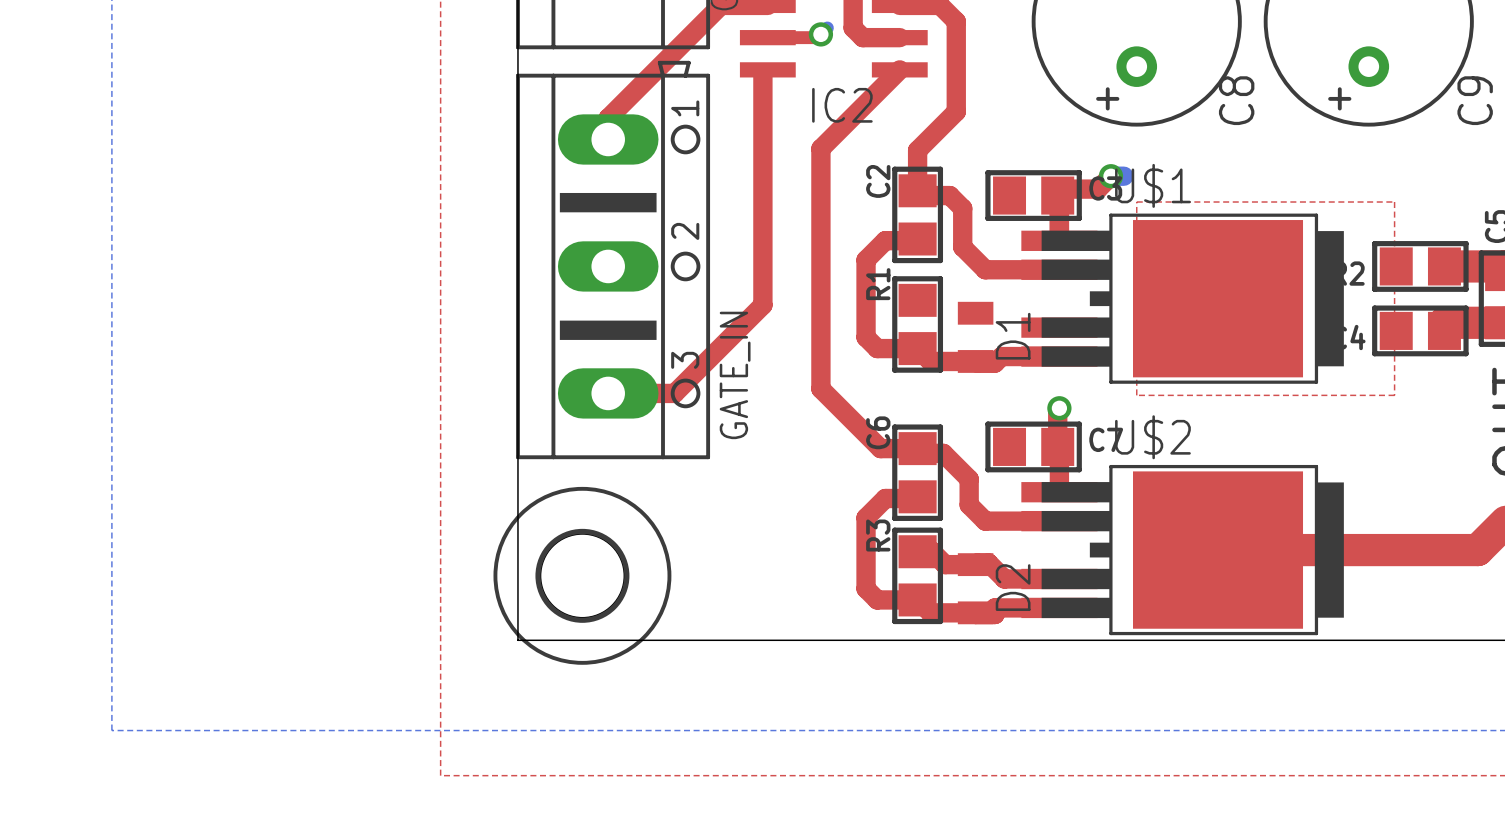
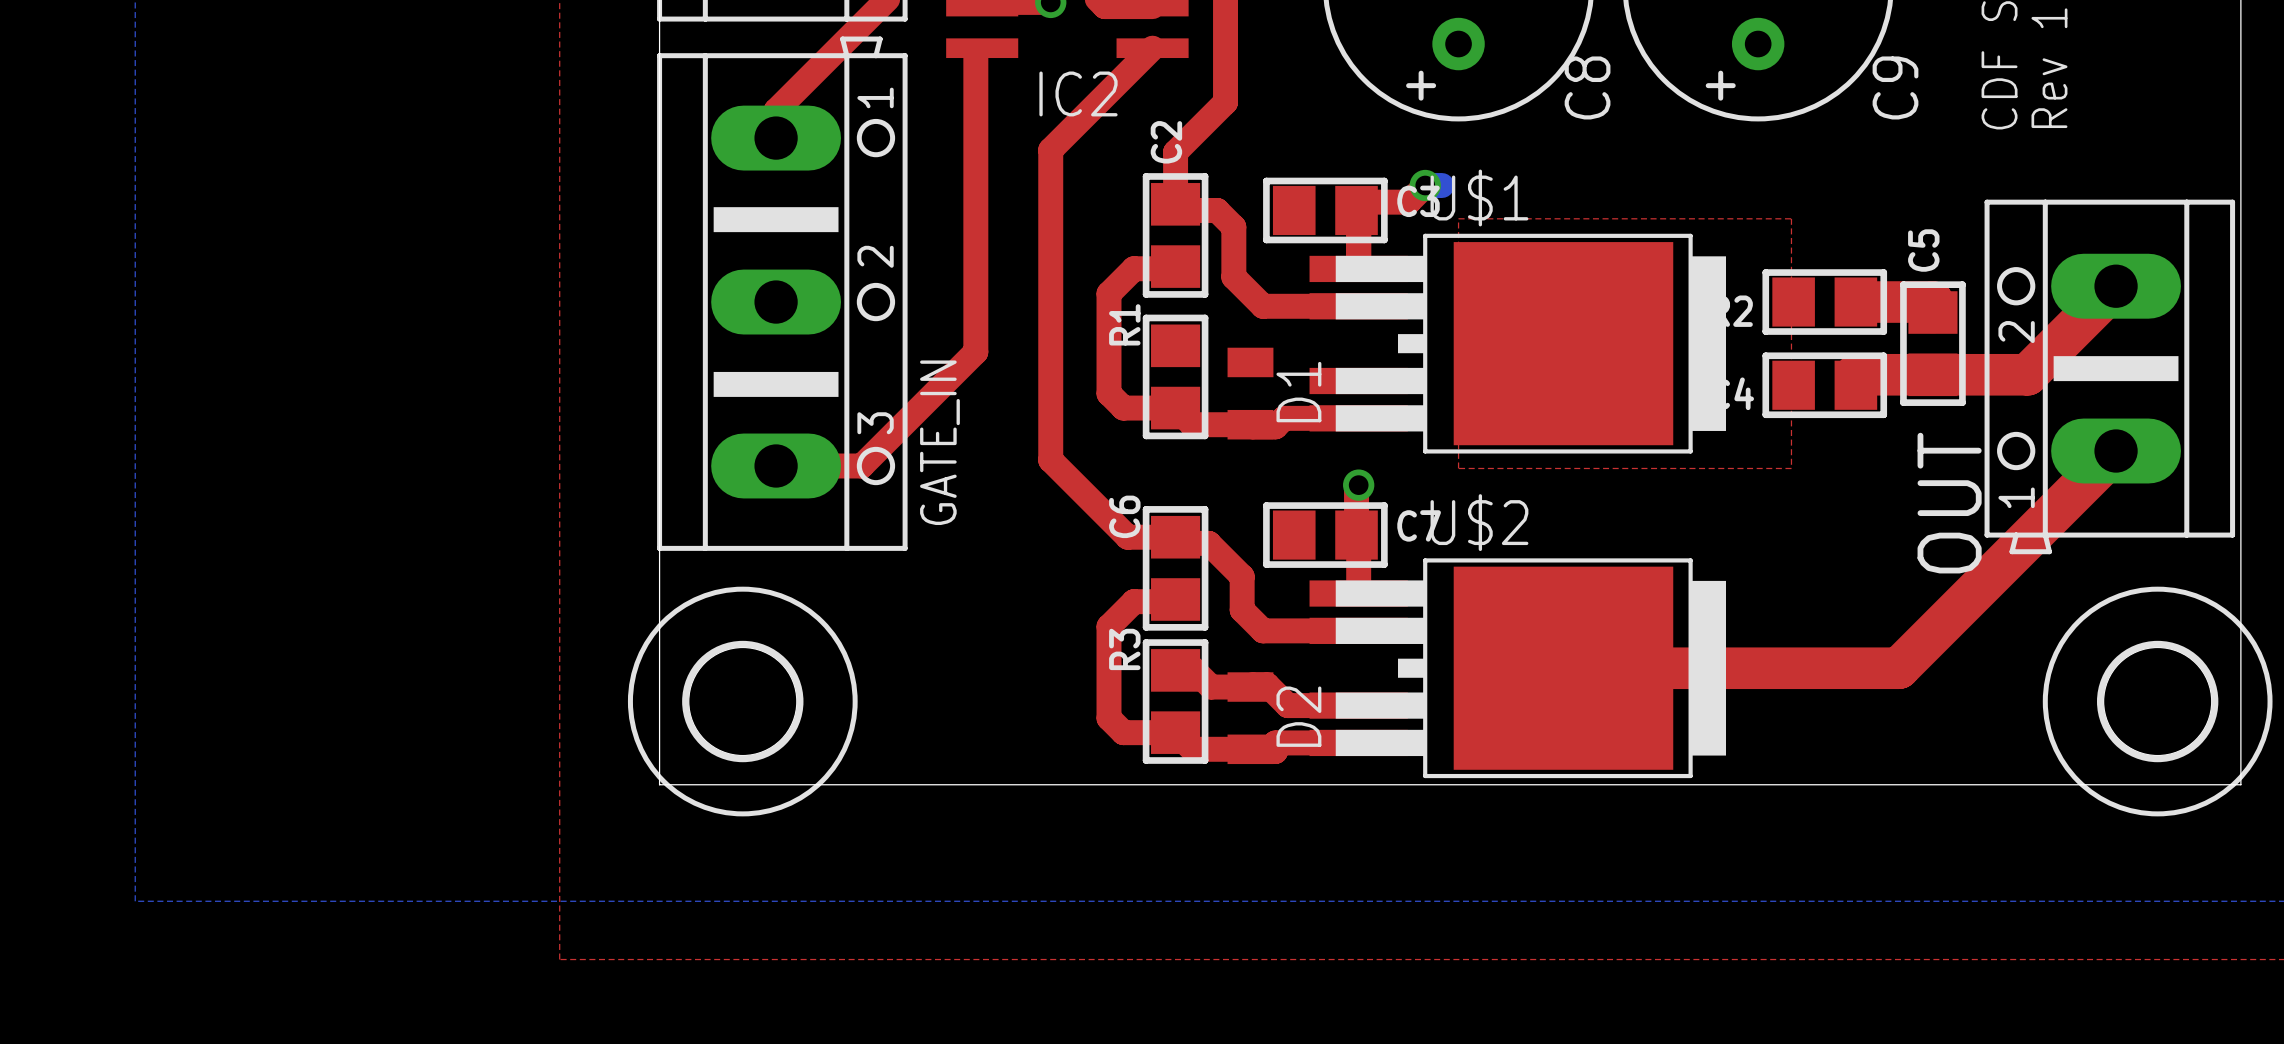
C2 name position: C2 (878, 181) -> C2 (1166, 142)

